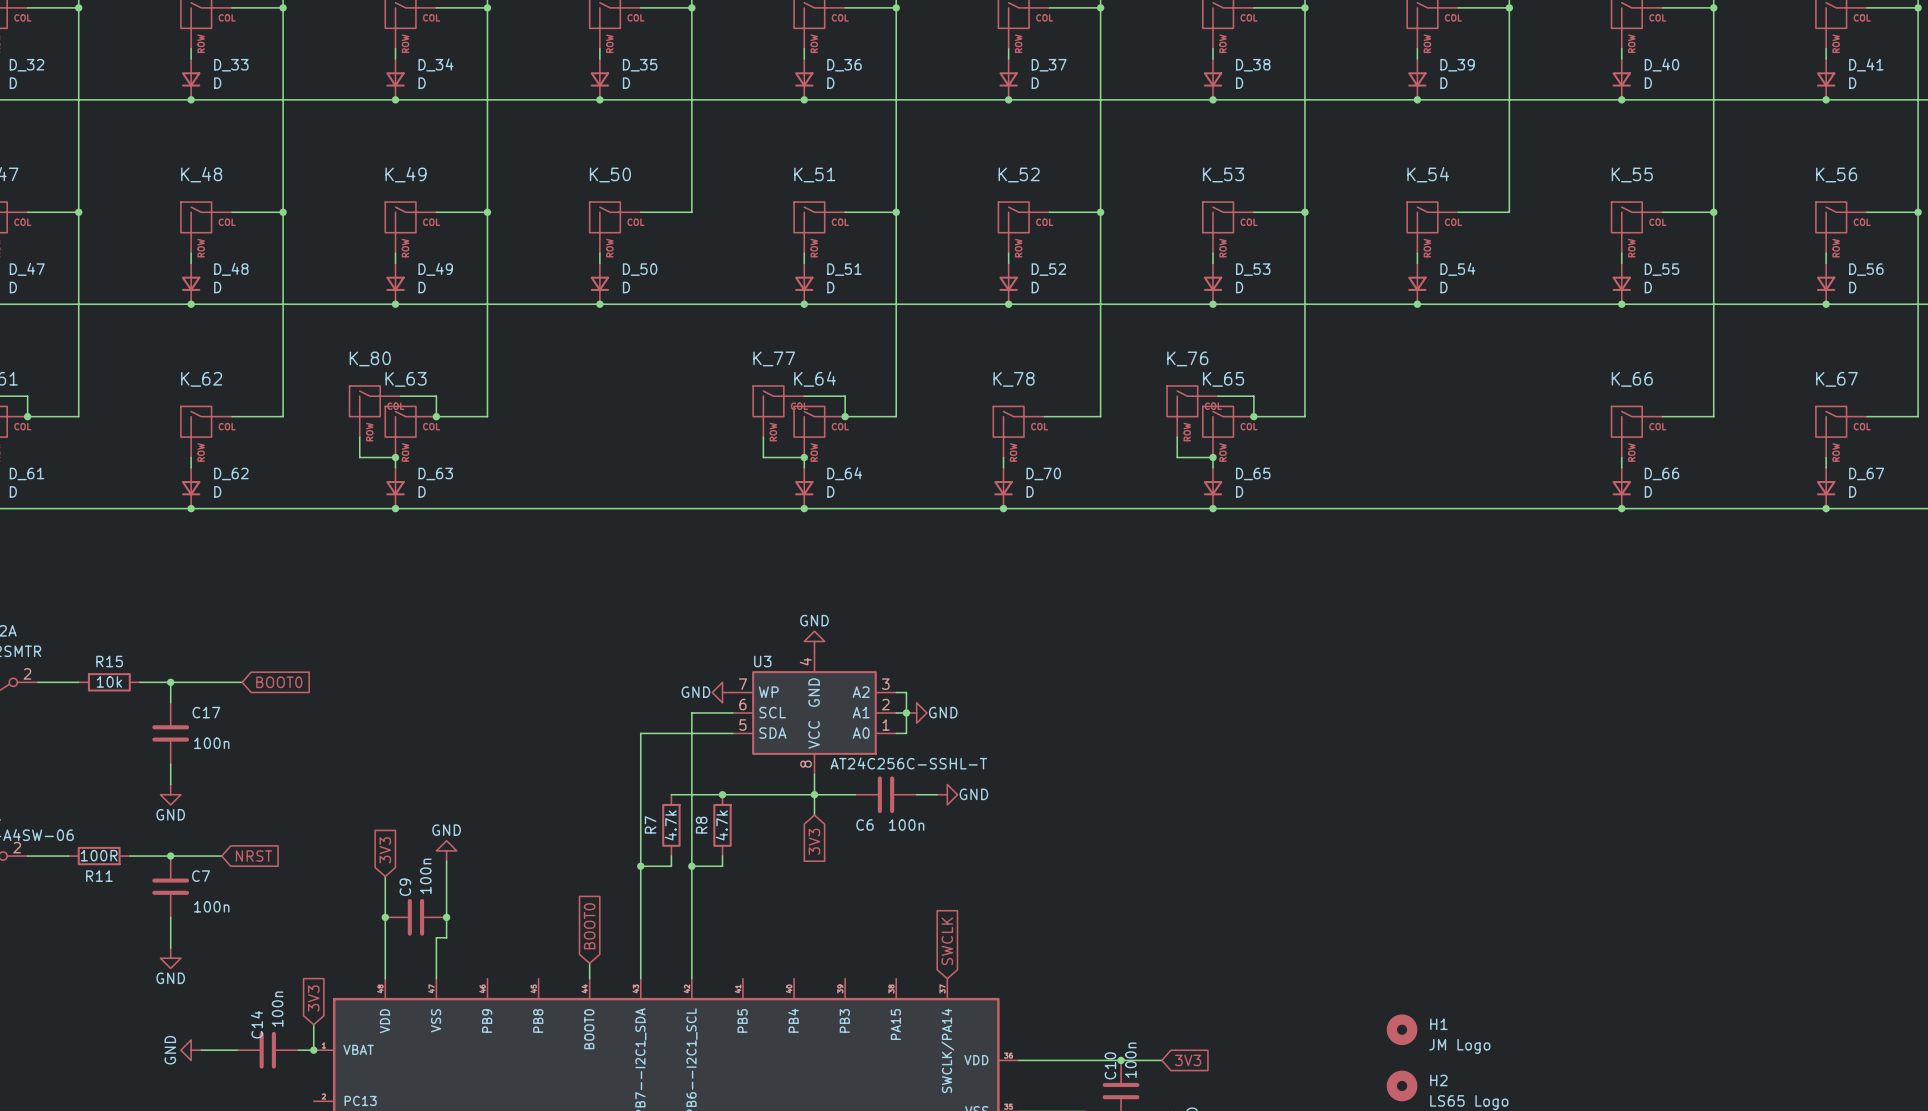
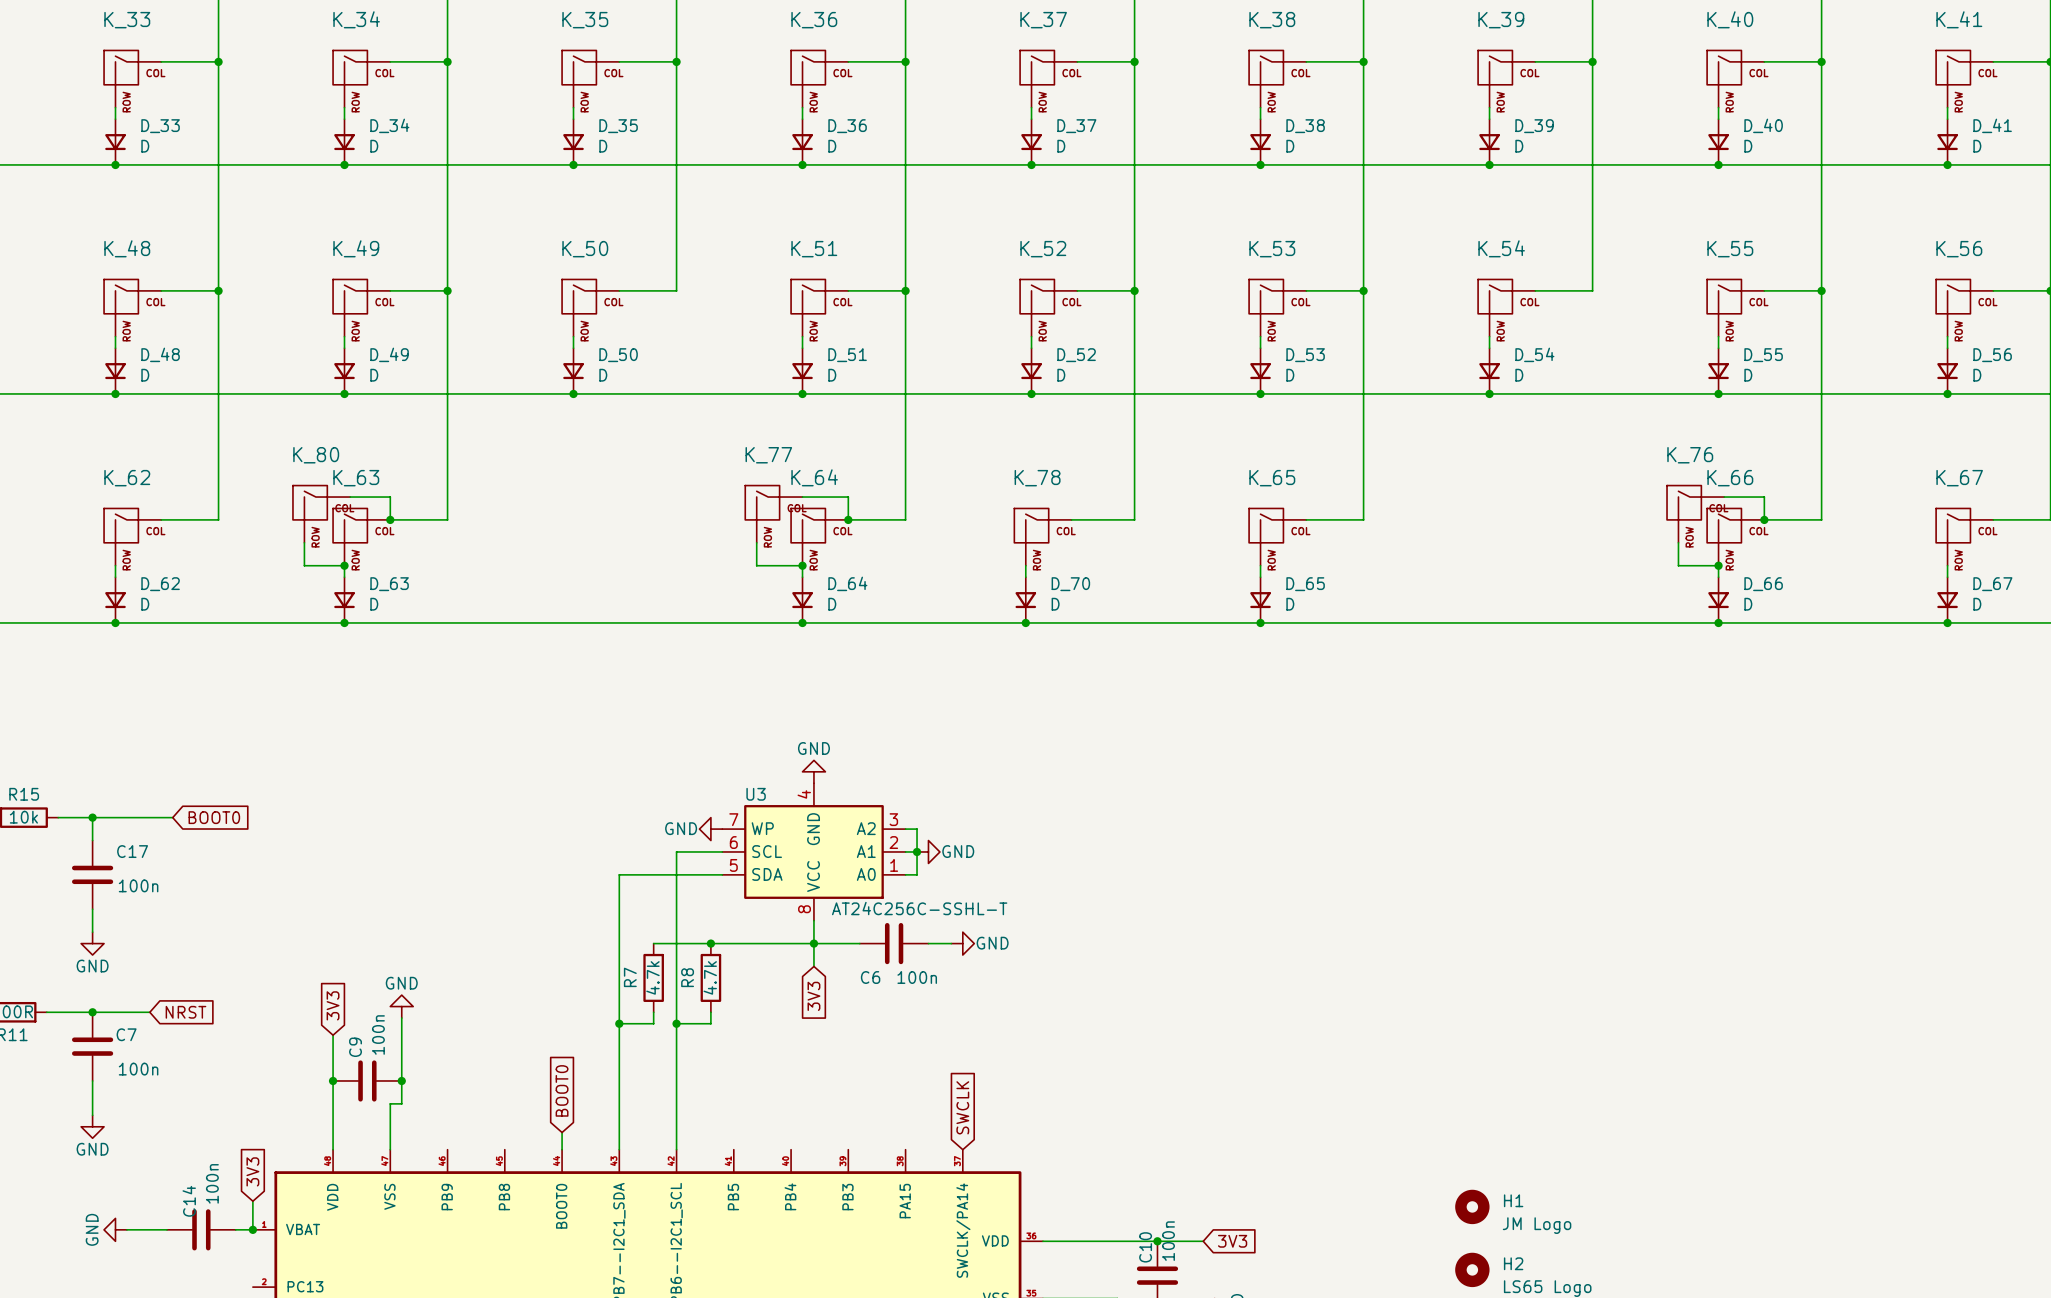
wire: (1218, 396) (1253, 396) (1253, 416) -> none
wire: none -> (1724, 497) (1764, 497) (1764, 519)
K_76 position: (1192, 411) -> (1695, 514)
junction: (1253, 416) -> none
junction: none -> (1764, 519)
wire: (1177, 437) (1177, 457) (1213, 457) -> none
wire: none -> (1678, 542) (1678, 565) (1718, 565)
junction: (1213, 457) -> none
junction: none -> (1718, 565)

